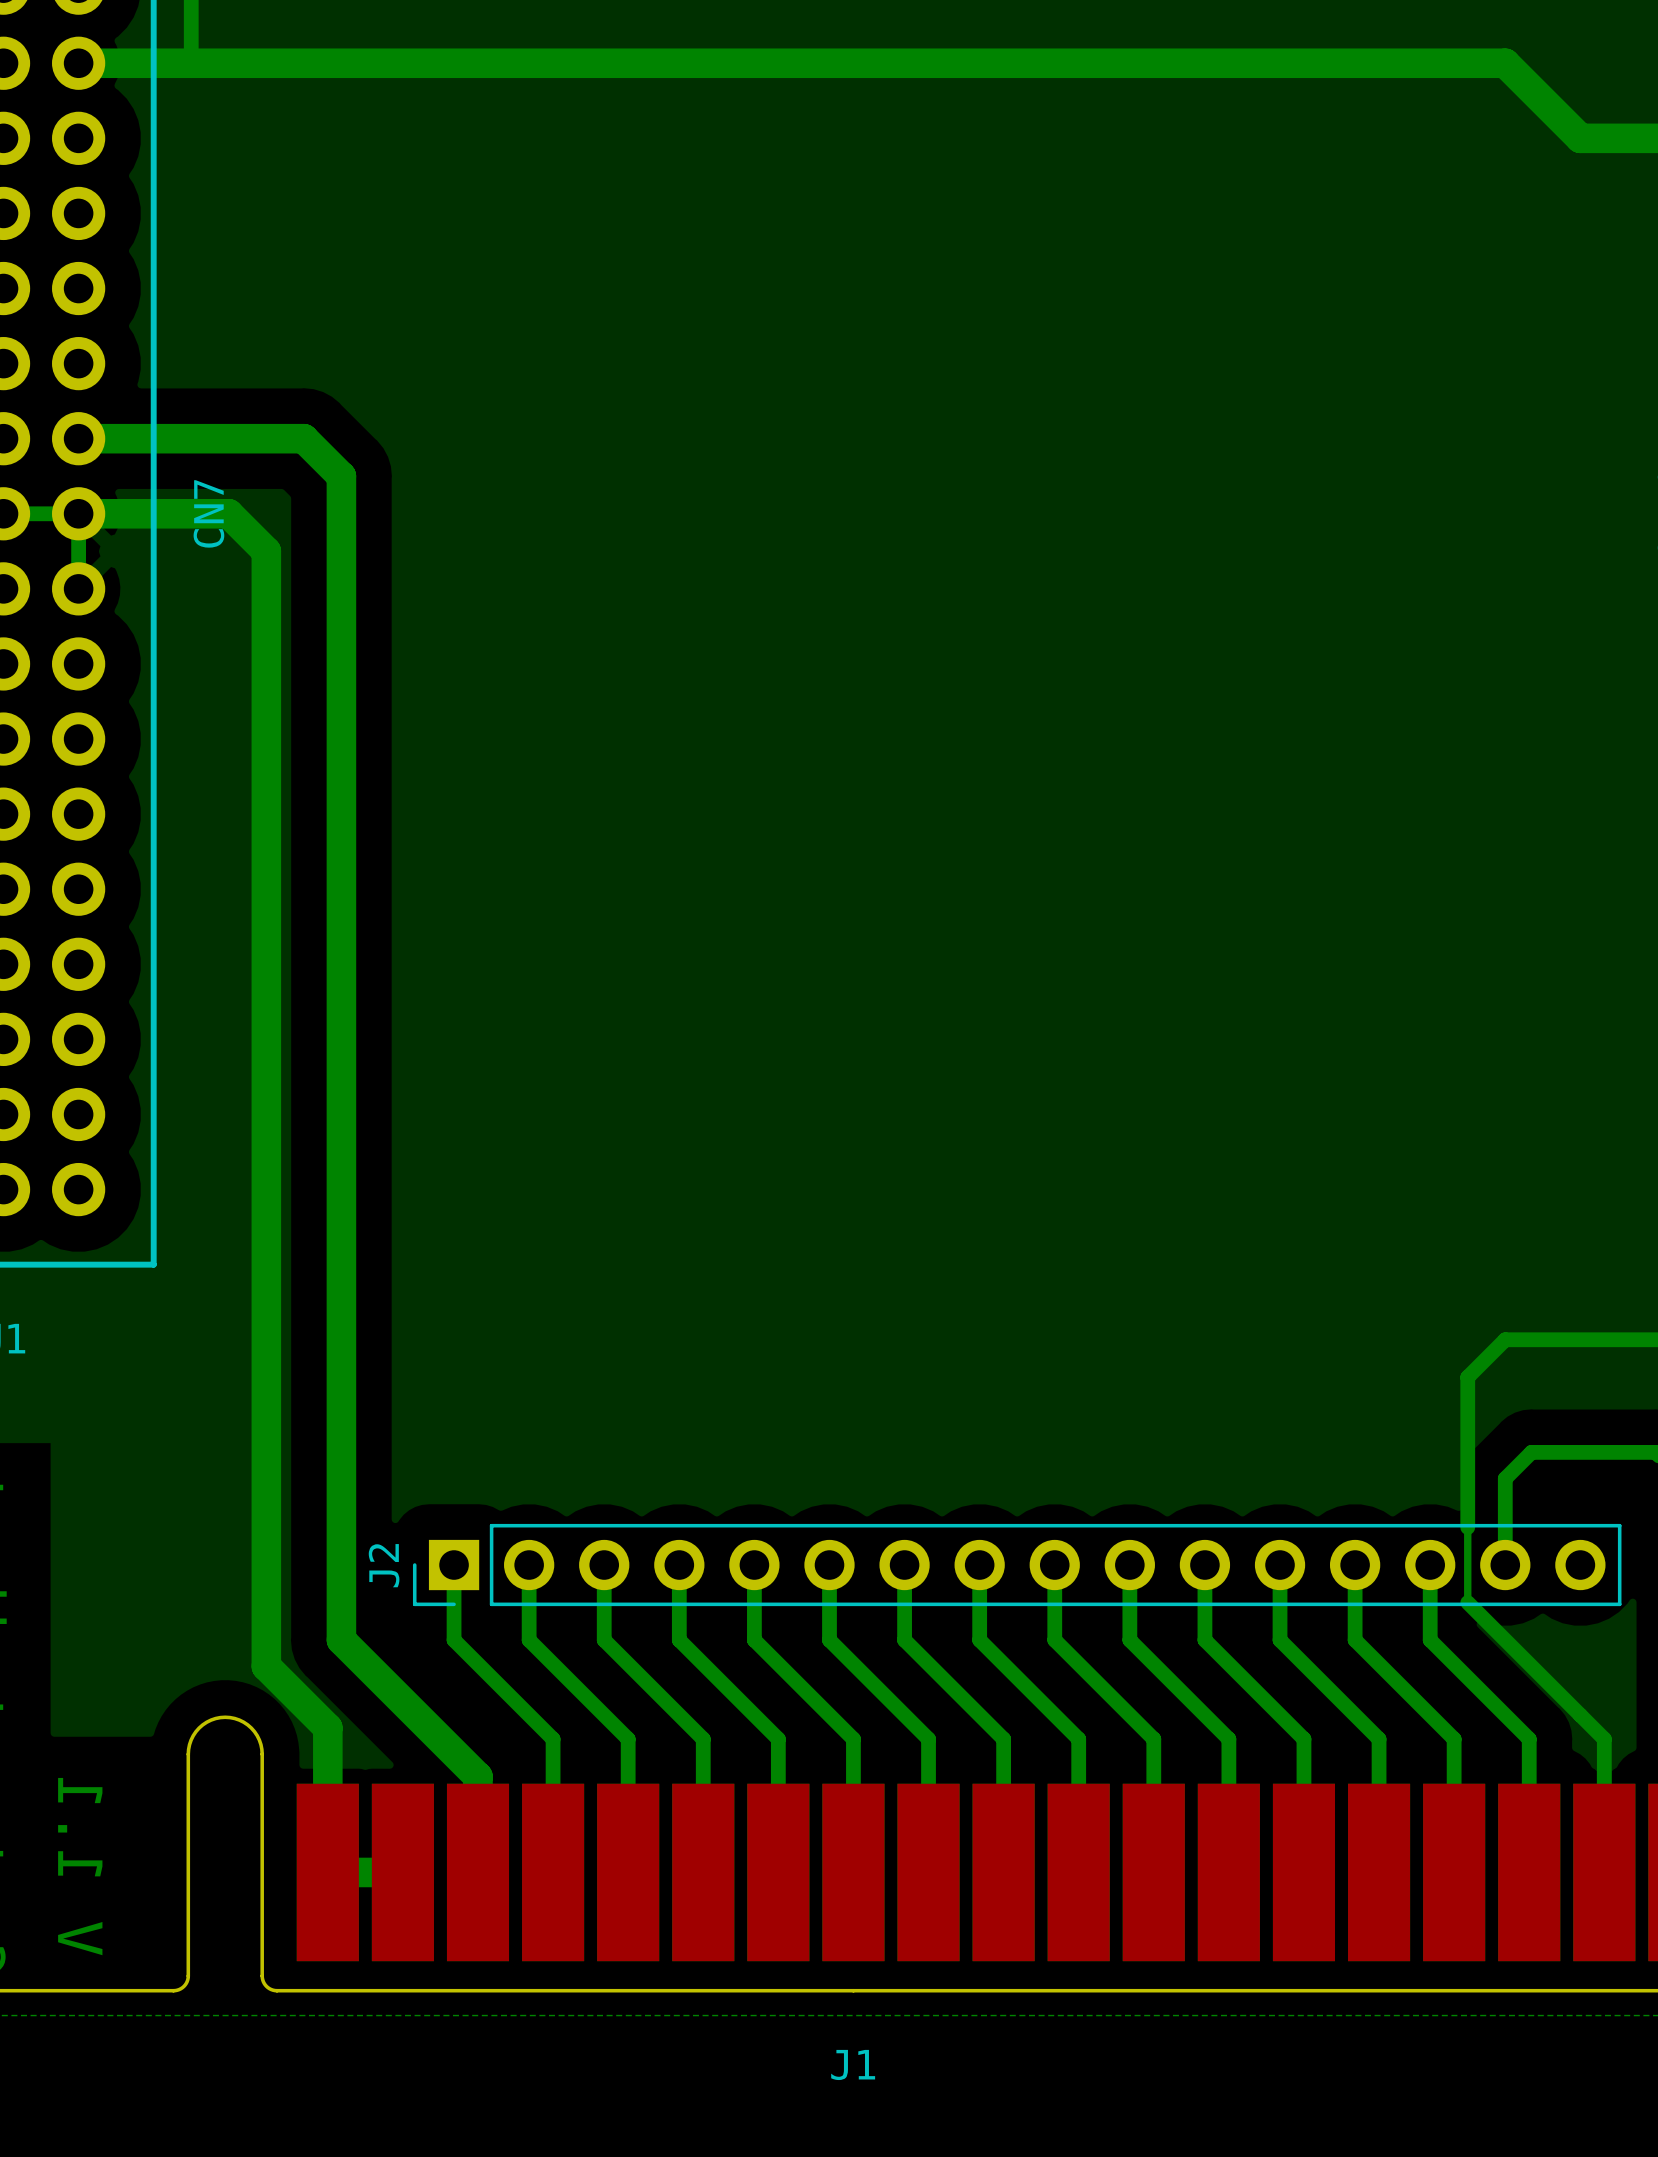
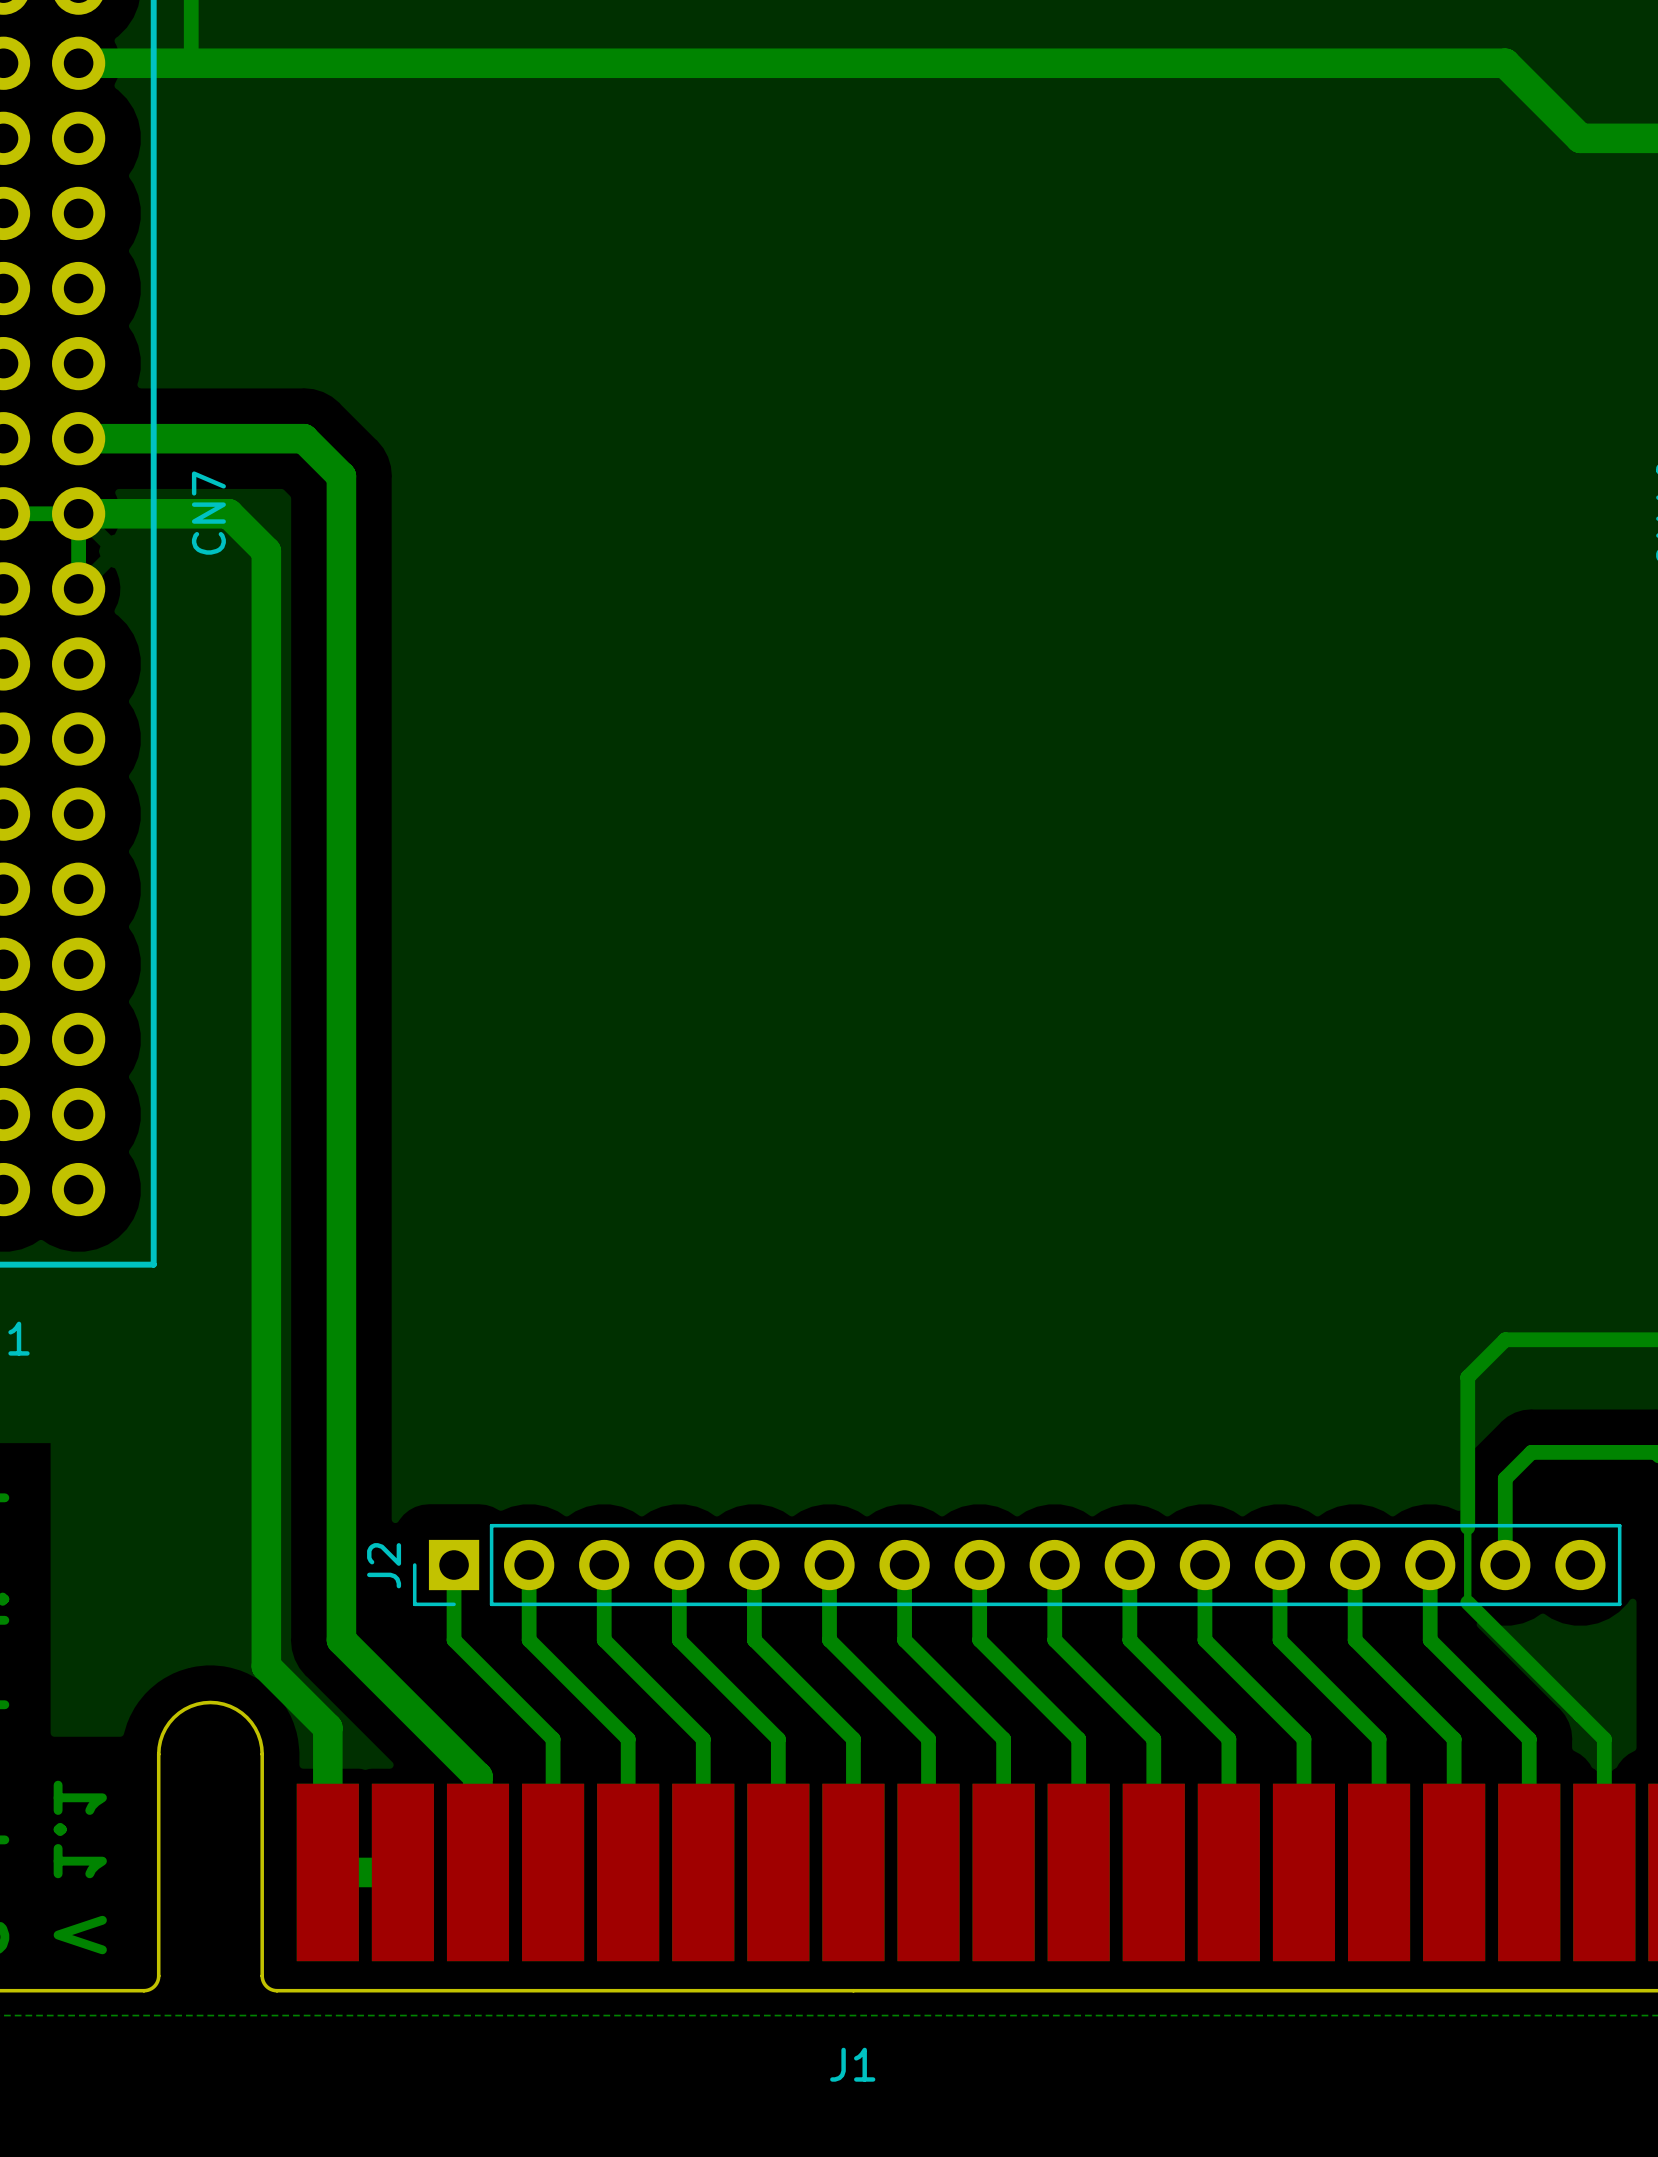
board edge: (262, 1754) (260, 1744) (254, 1731) (247, 1724) (234, 1718) (220, 1717) (211, 1720) (199, 1728) (193, 1735) (188, 1754) (188, 1977) (185, 1984) (177, 1990) (143, 1990) -> (262, 1754) (260, 1740) (251, 1722) (241, 1713) (223, 1704) (210, 1702) (190, 1706) (173, 1717) (165, 1728) (160, 1740) (158, 1754) (158, 1977) (154, 1986) (143, 1990)

